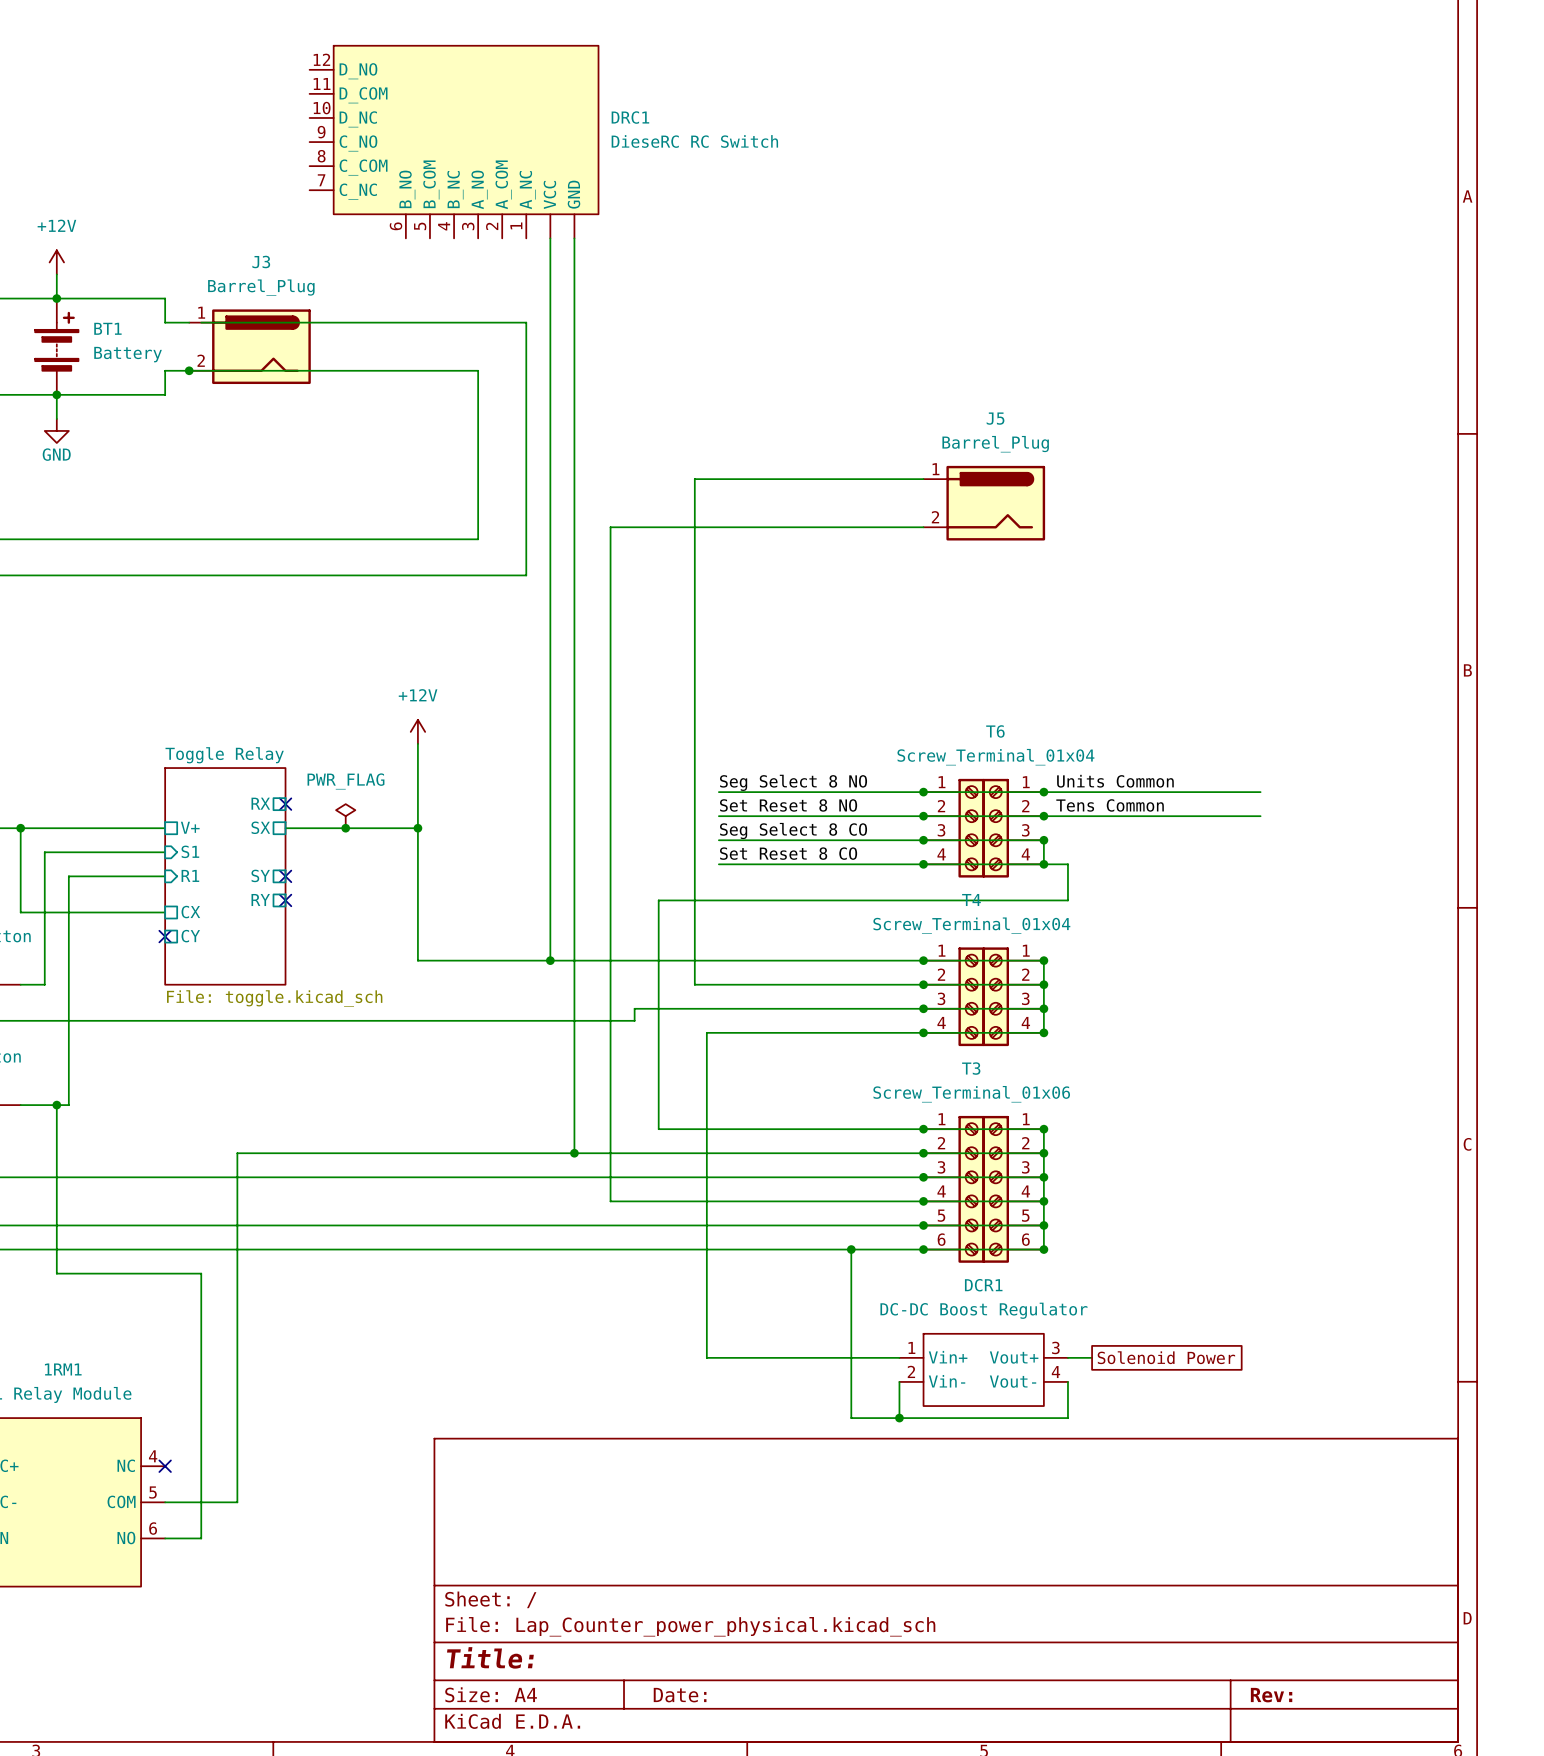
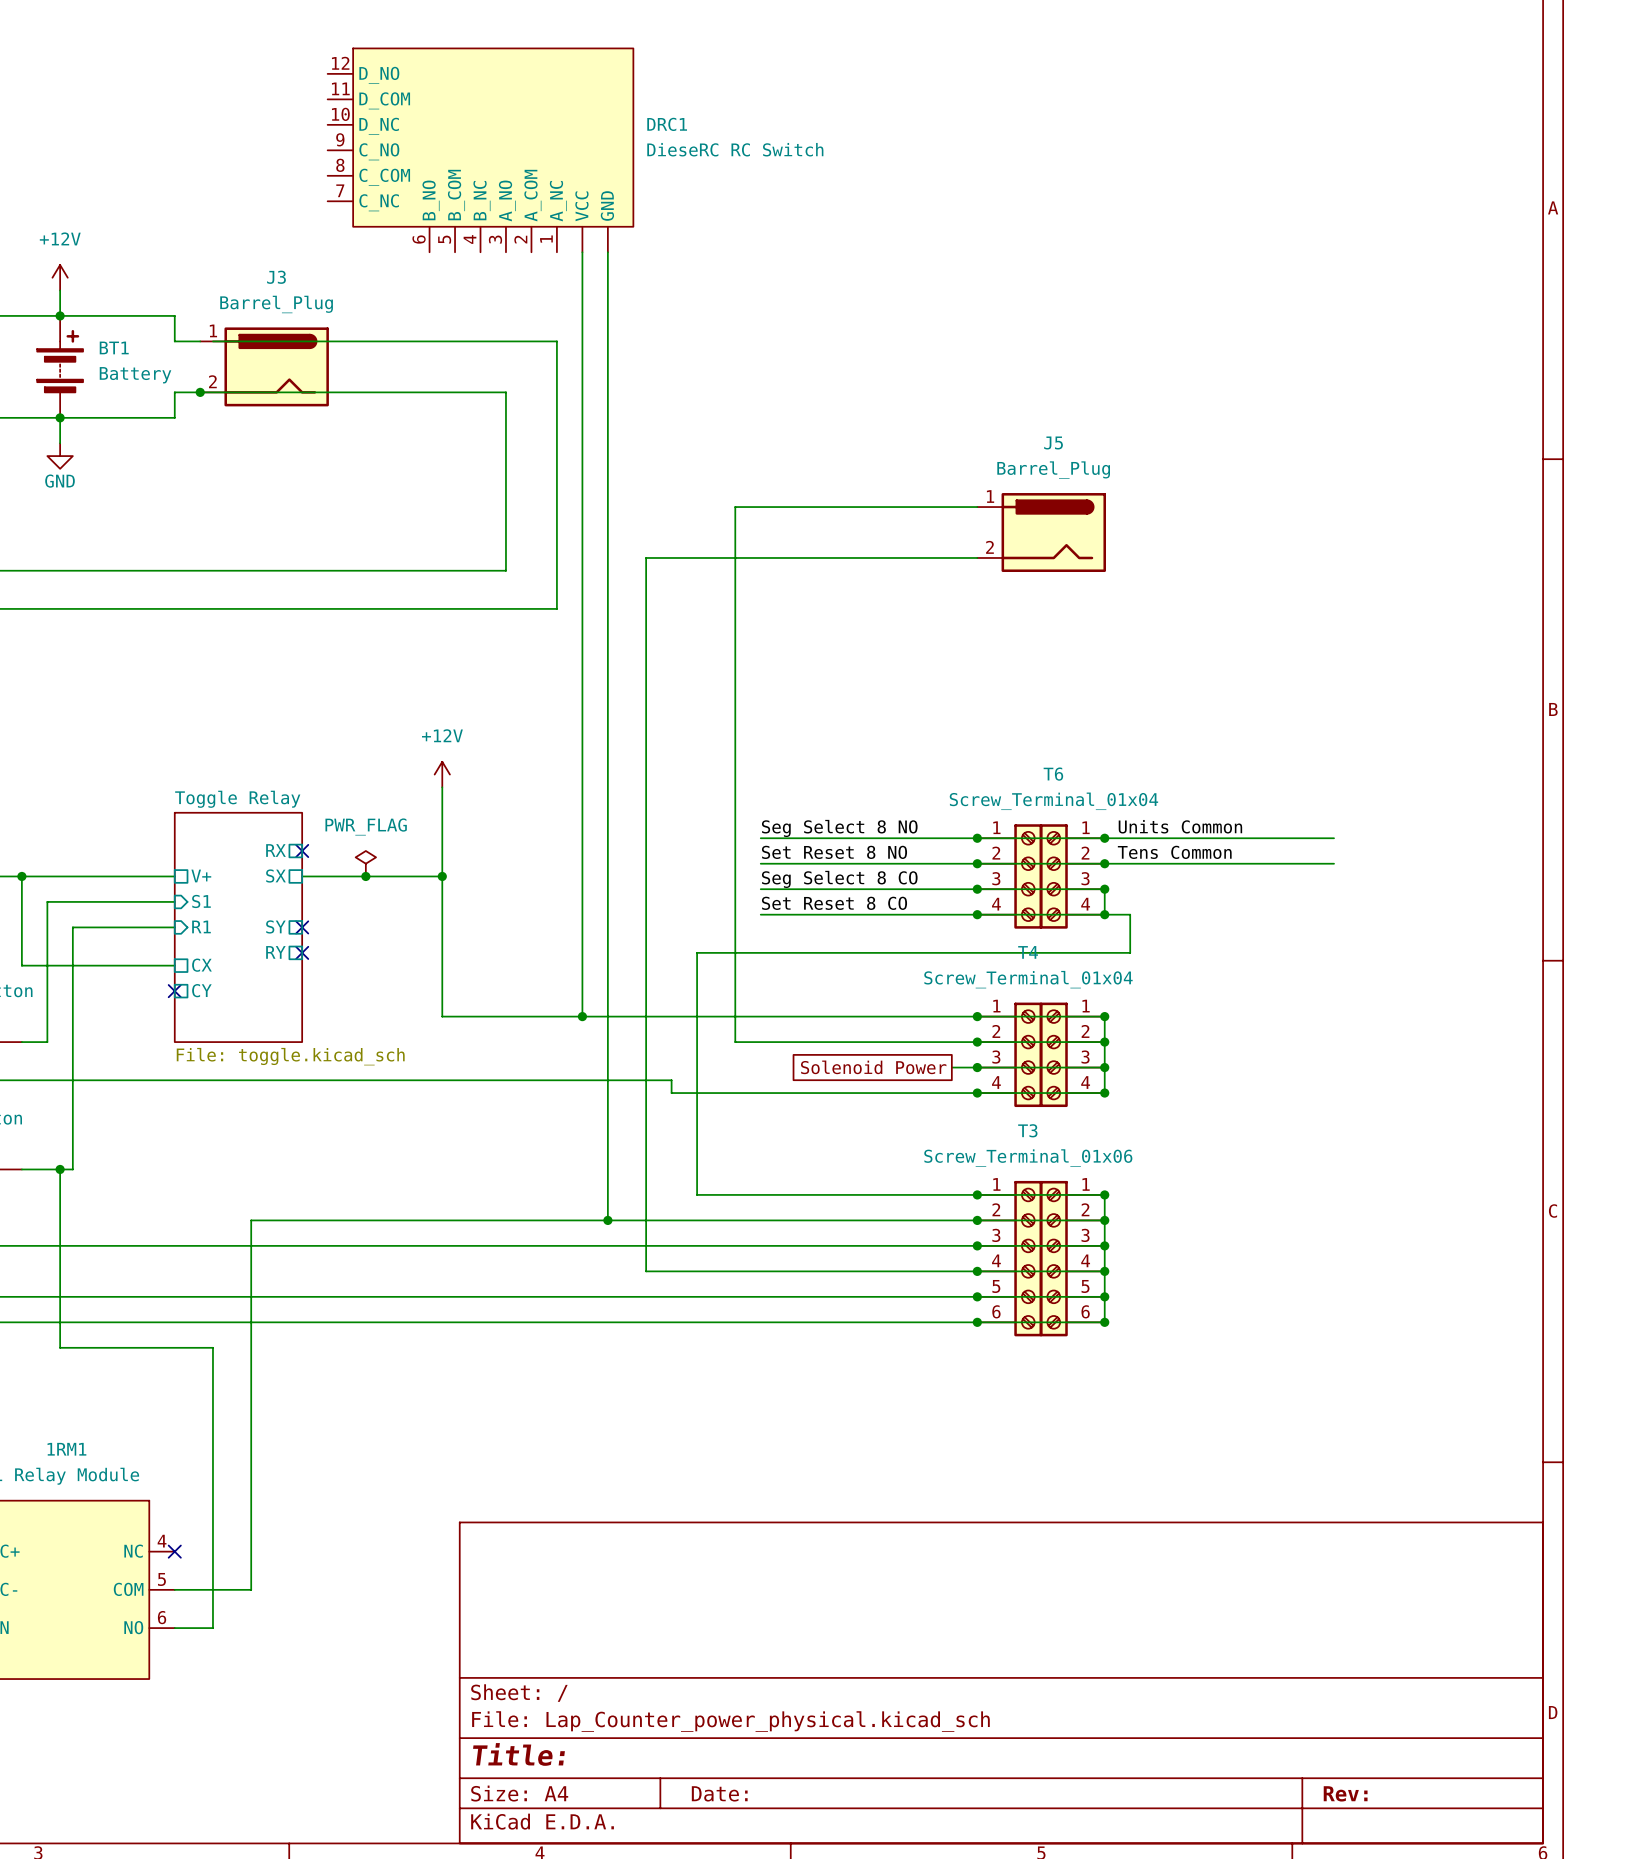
global label: none -> Solenoid Power (873, 1067)
wire: (899, 1008) (634, 1008) (634, 1020) -> (748, 1093) (671, 1093) (671, 1080)
wire: (706, 1032) (706, 1357) (899, 1357) -> none
wire: (851, 1249) (851, 1418) (1067, 1418) (1067, 1381) -> none
junction: (851, 1249) -> none
wire: (1067, 1357) (1092, 1357) -> none
global label: Solenoid Power (1166, 1357) -> none
DCR1: DC-DC Boost Regulator (983, 1369) -> none
wire: (899, 1381) (899, 1418) -> none
junction: (899, 1418) -> none

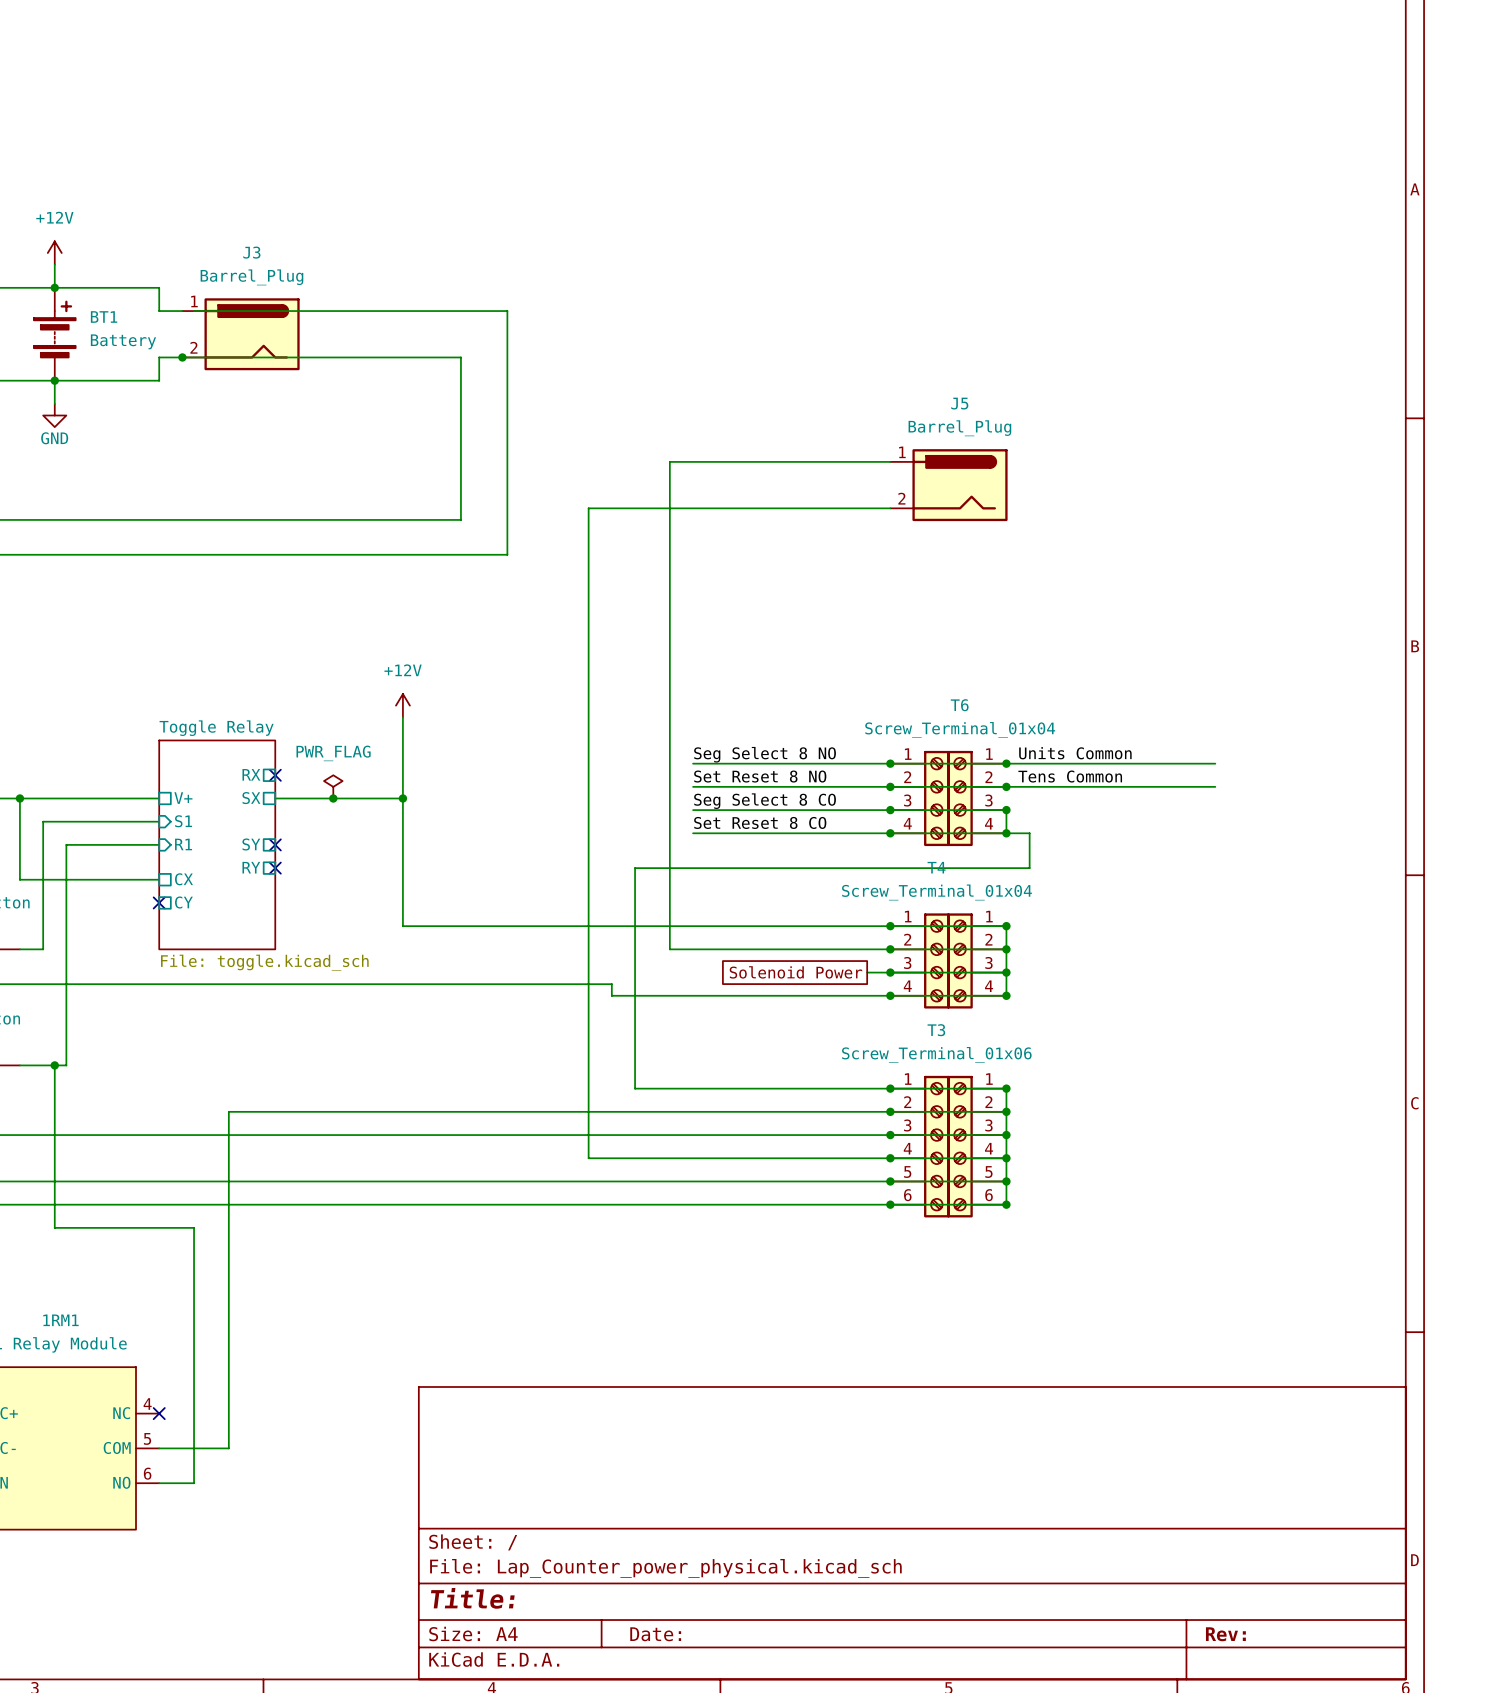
DRC1: DieseRC RC Switch (480, 150) -> none
wire: (582, 252) (582, 1016) -> none
wire: (607, 252) (607, 1220) -> none
junction: (582, 1016) -> none
junction: (607, 1220) -> none

